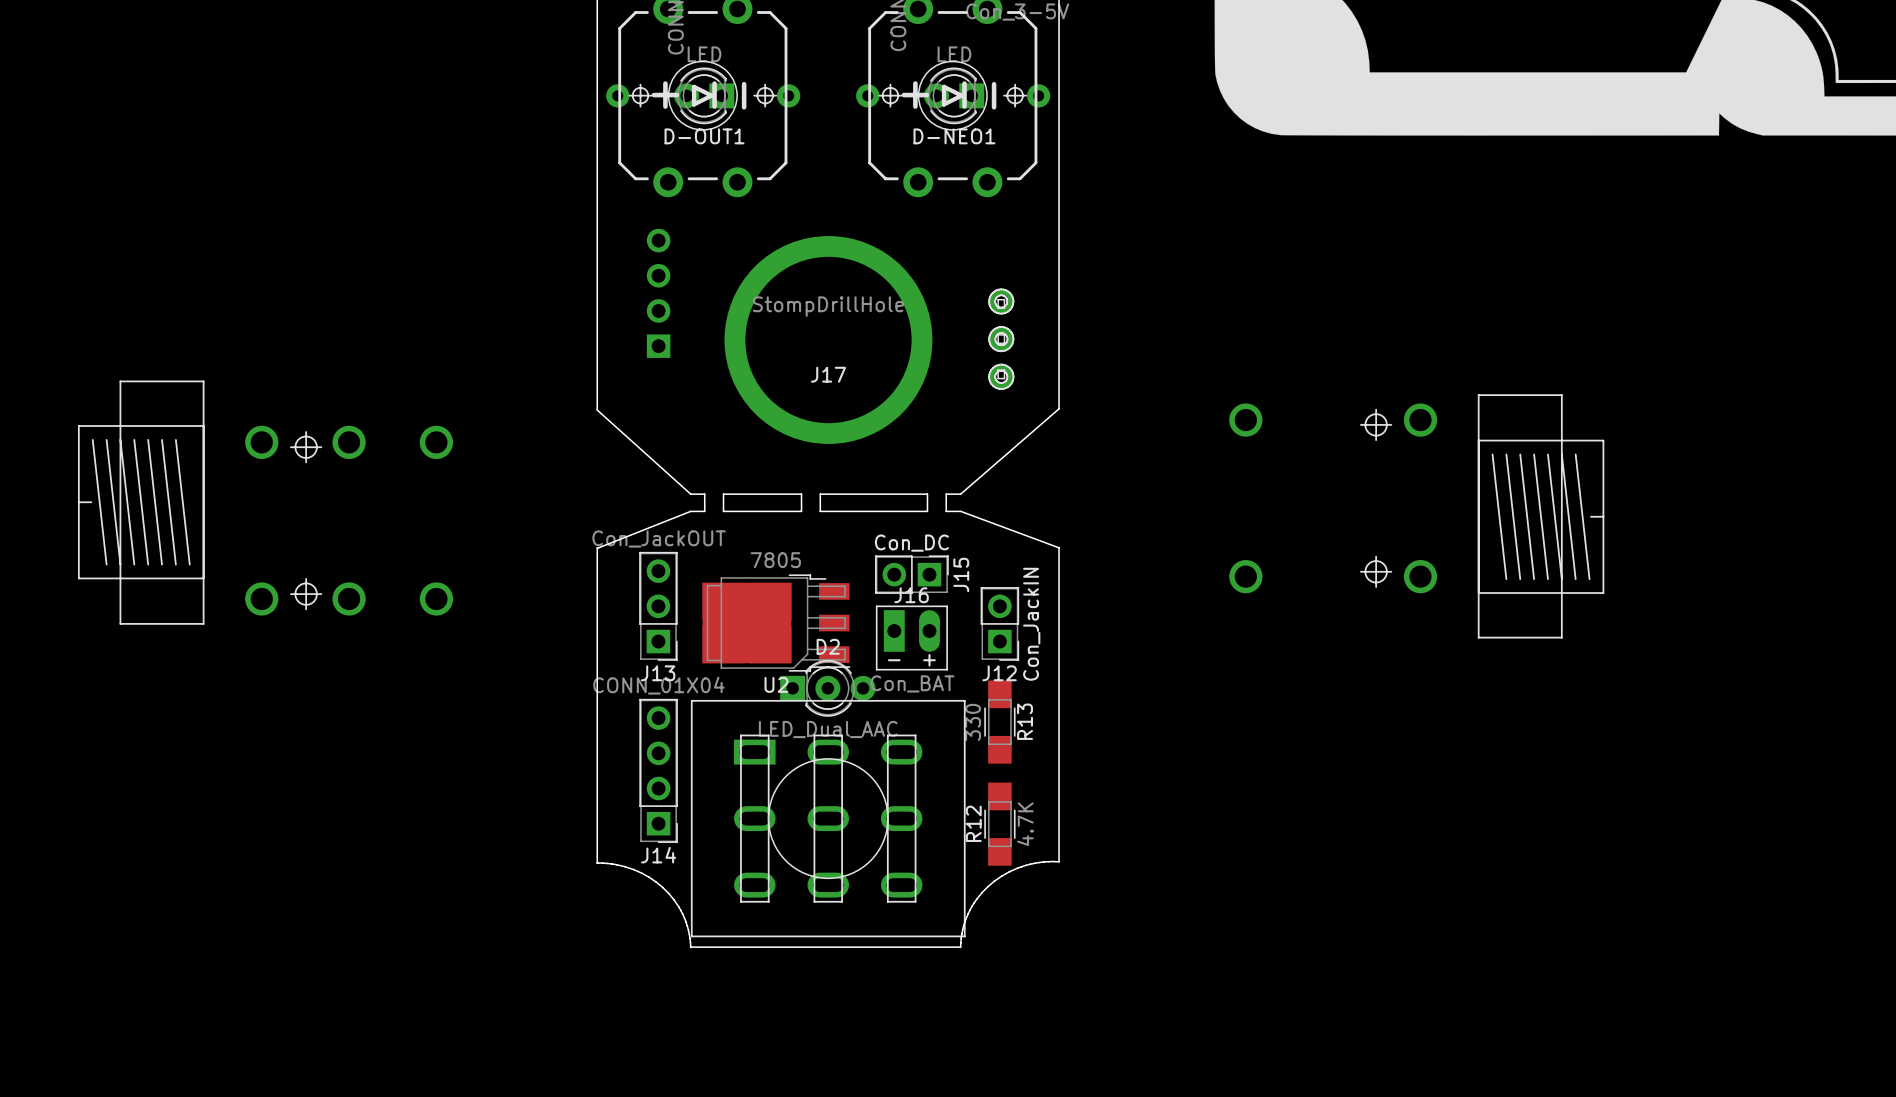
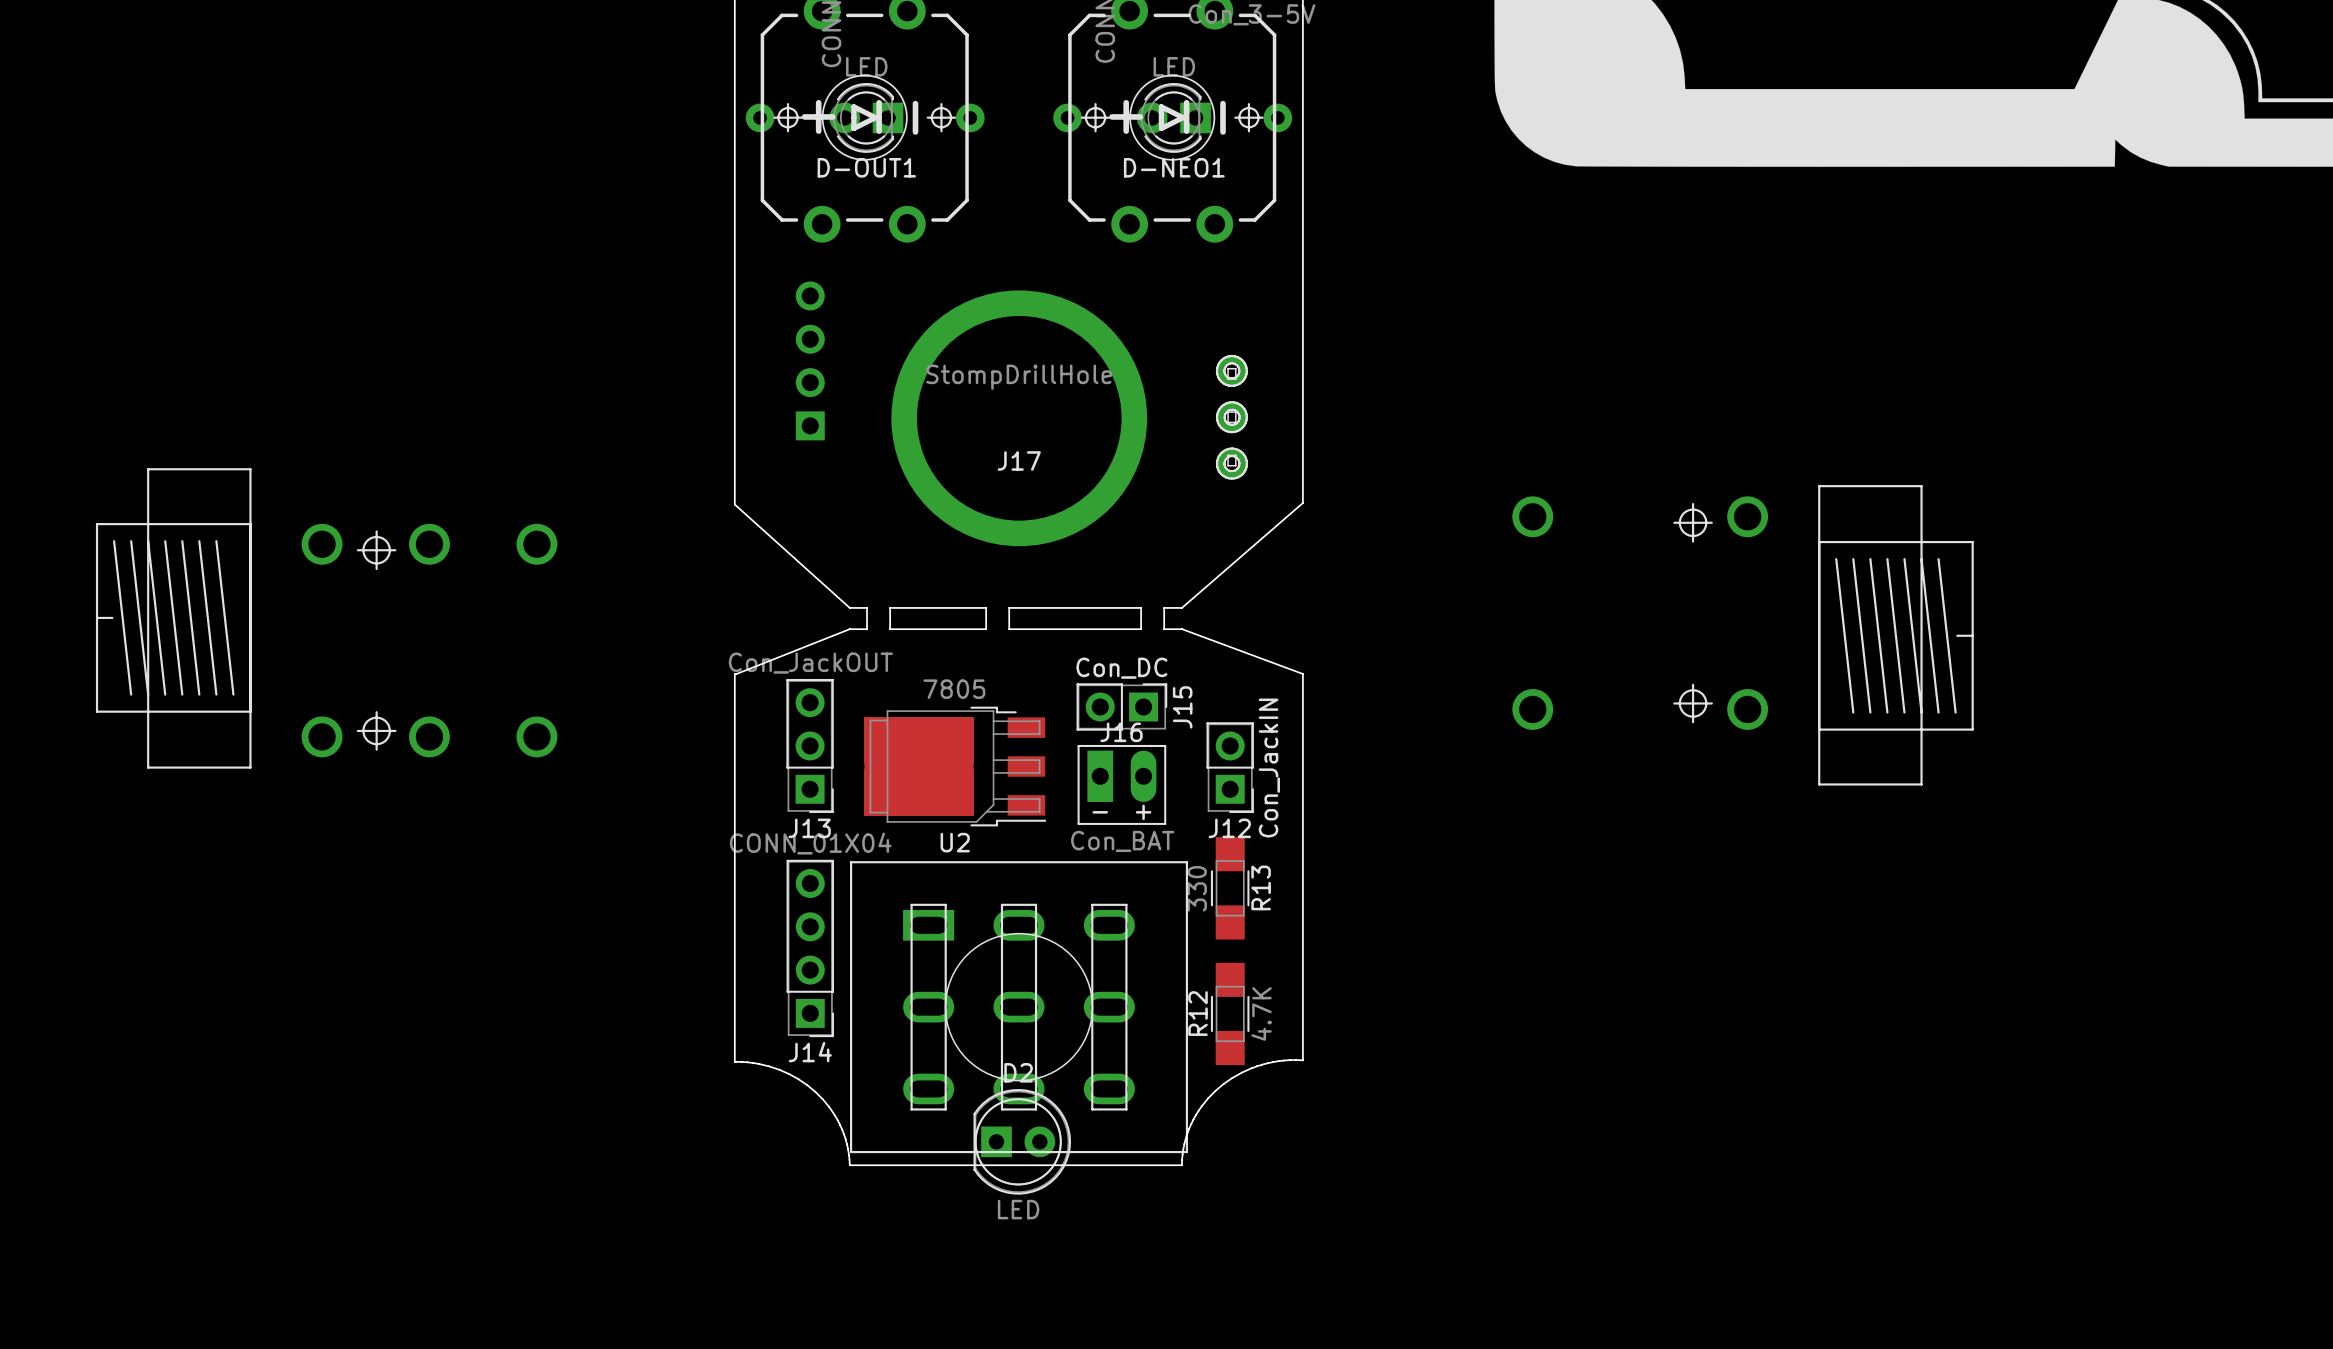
D2 footprint: [780, 659, 876, 717] -> [973, 1089, 1072, 1195]
D2 value: LED_Dual_AAC (828, 729) -> LED (1018, 1209)

